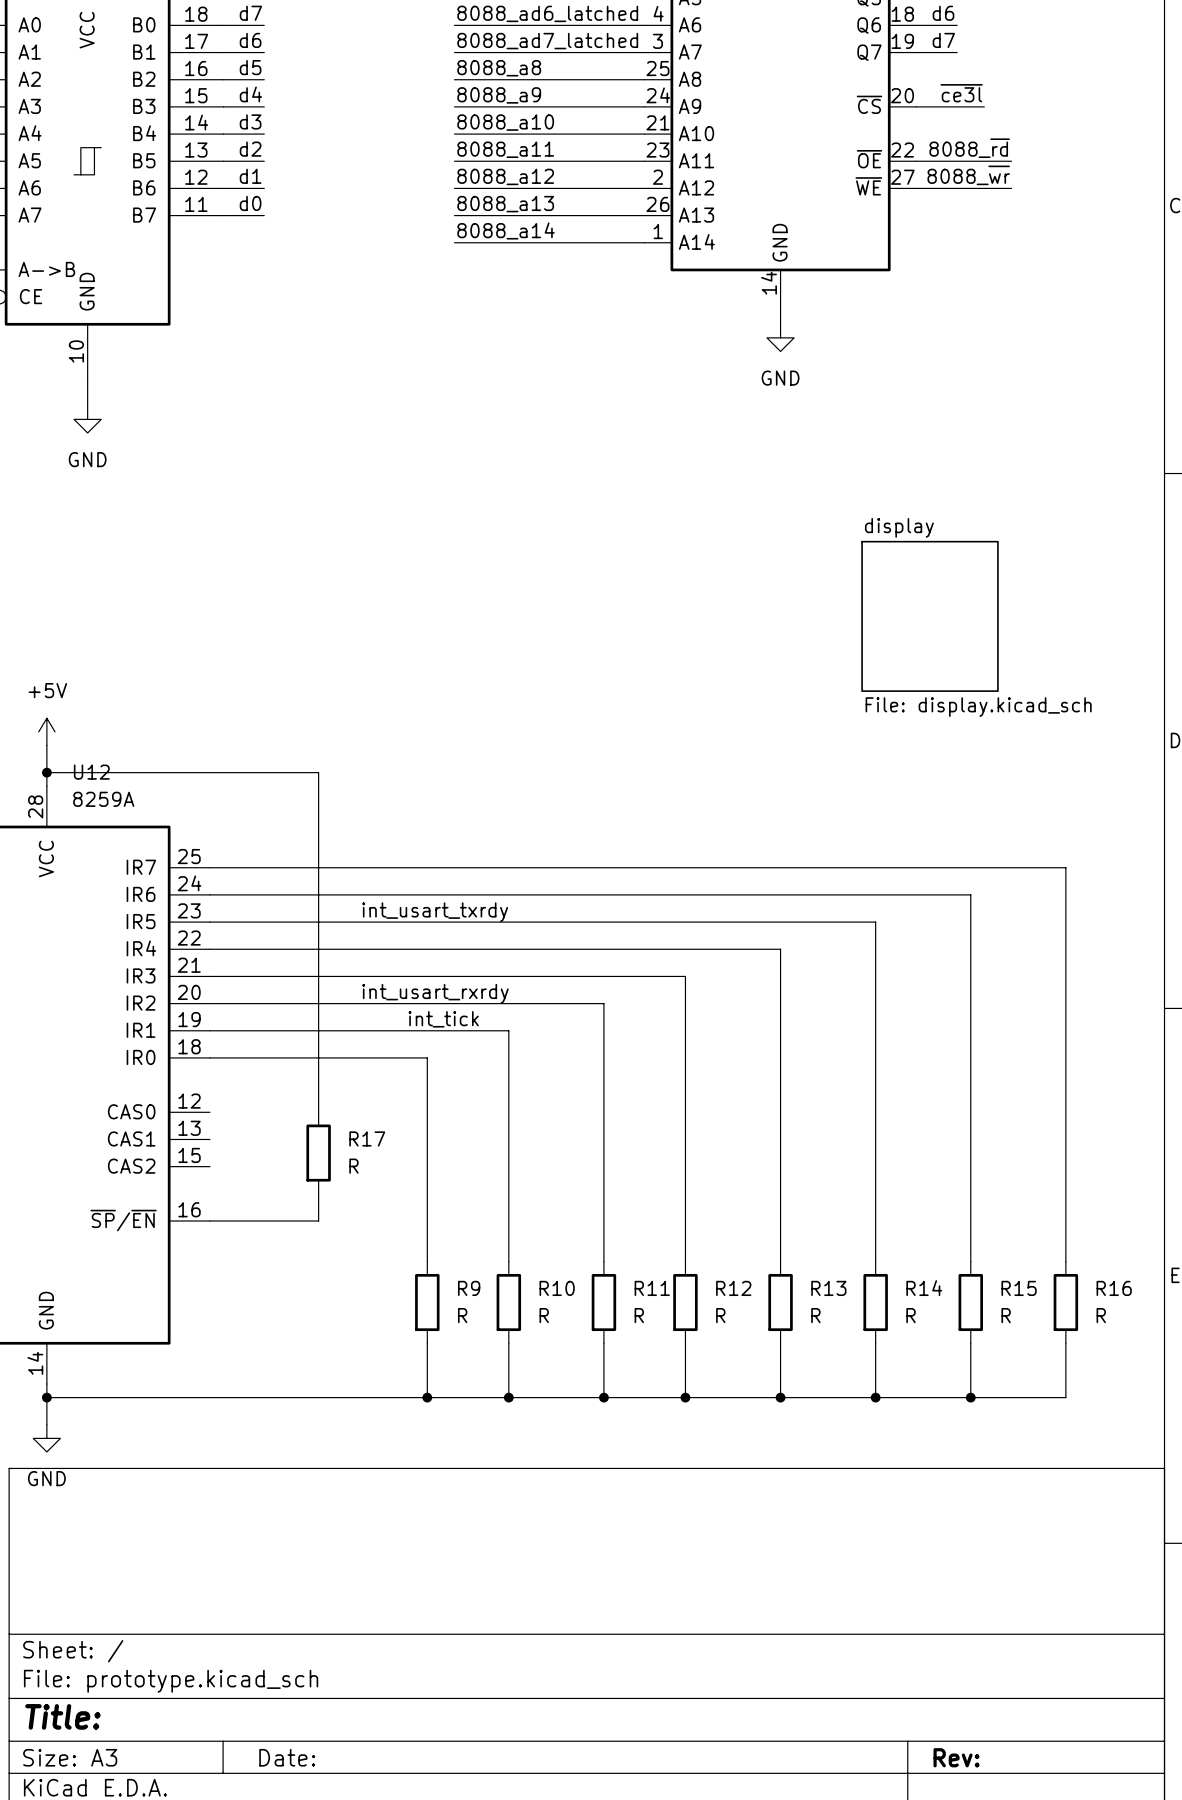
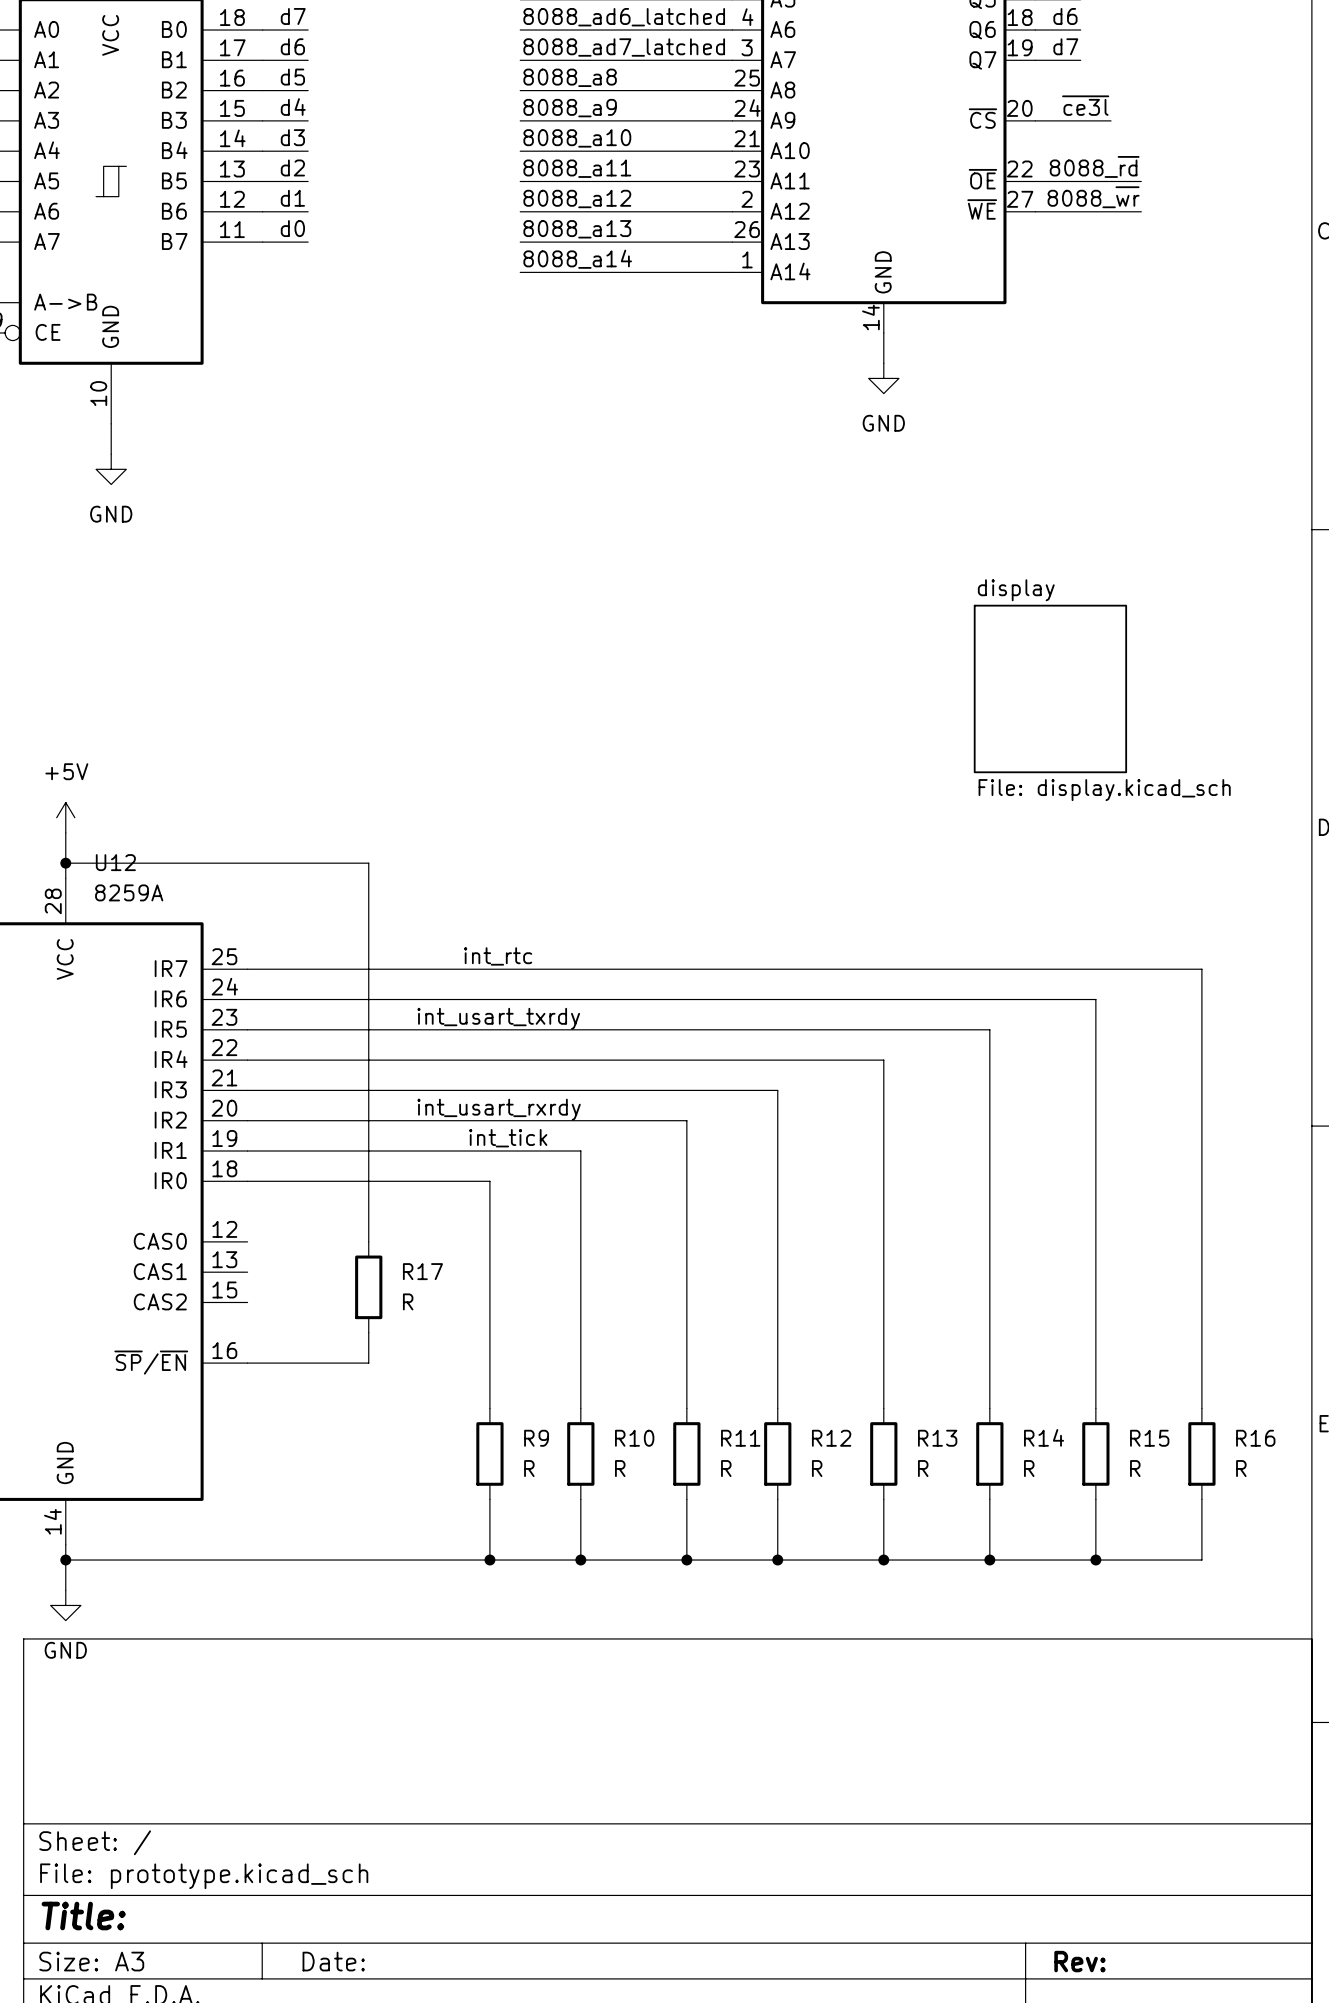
label: none -> int_rtc (498, 956)

